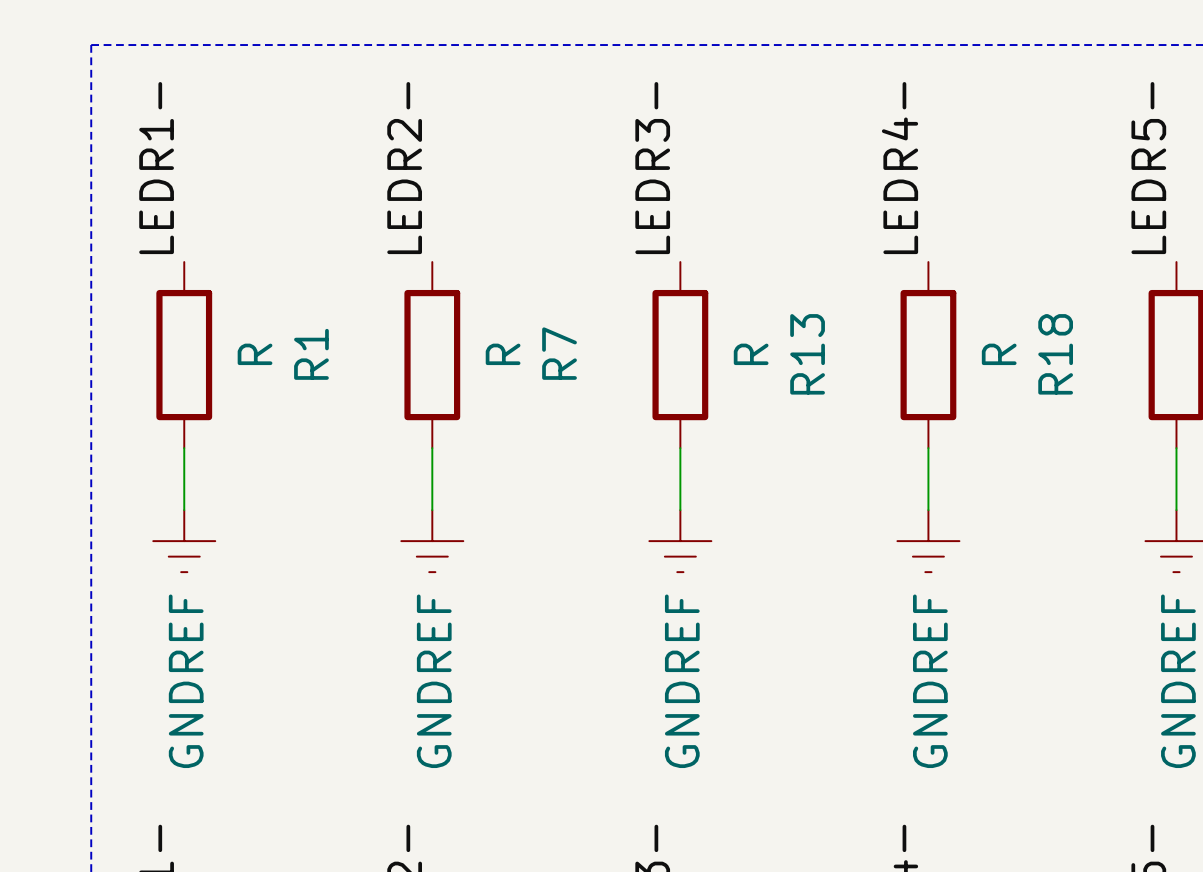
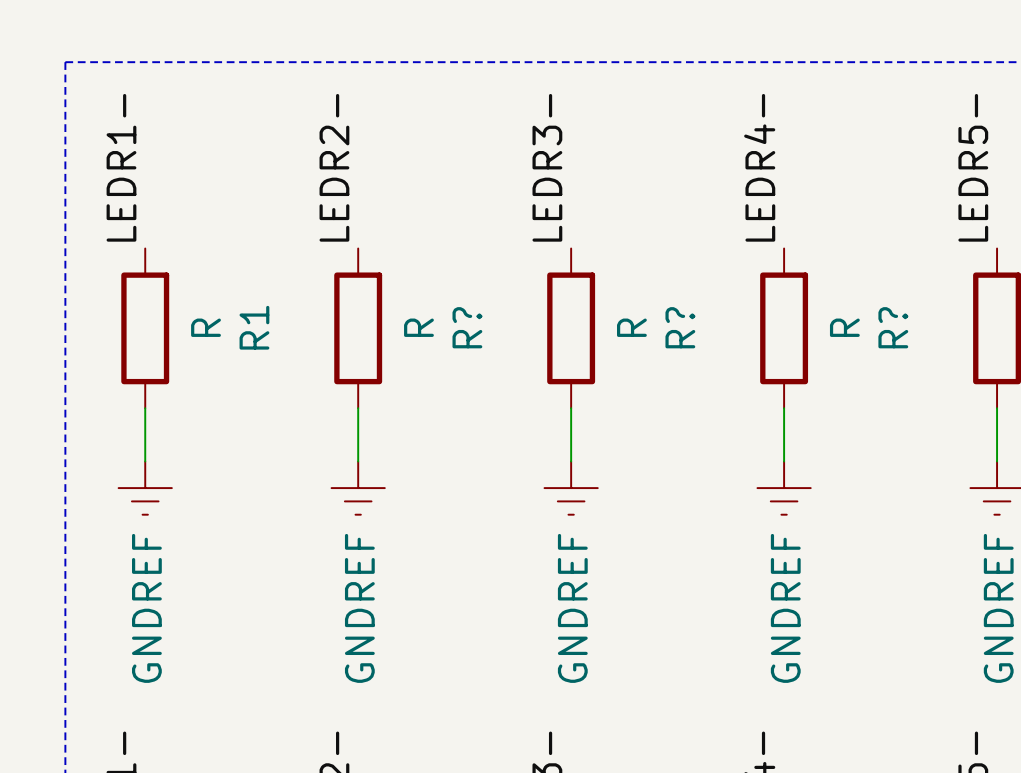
R7 name: R7 (559, 353) -> R? (467, 327)
R13 name: R13 (807, 354) -> R? (680, 327)
R18 name: R18 (1055, 354) -> R? (893, 327)

